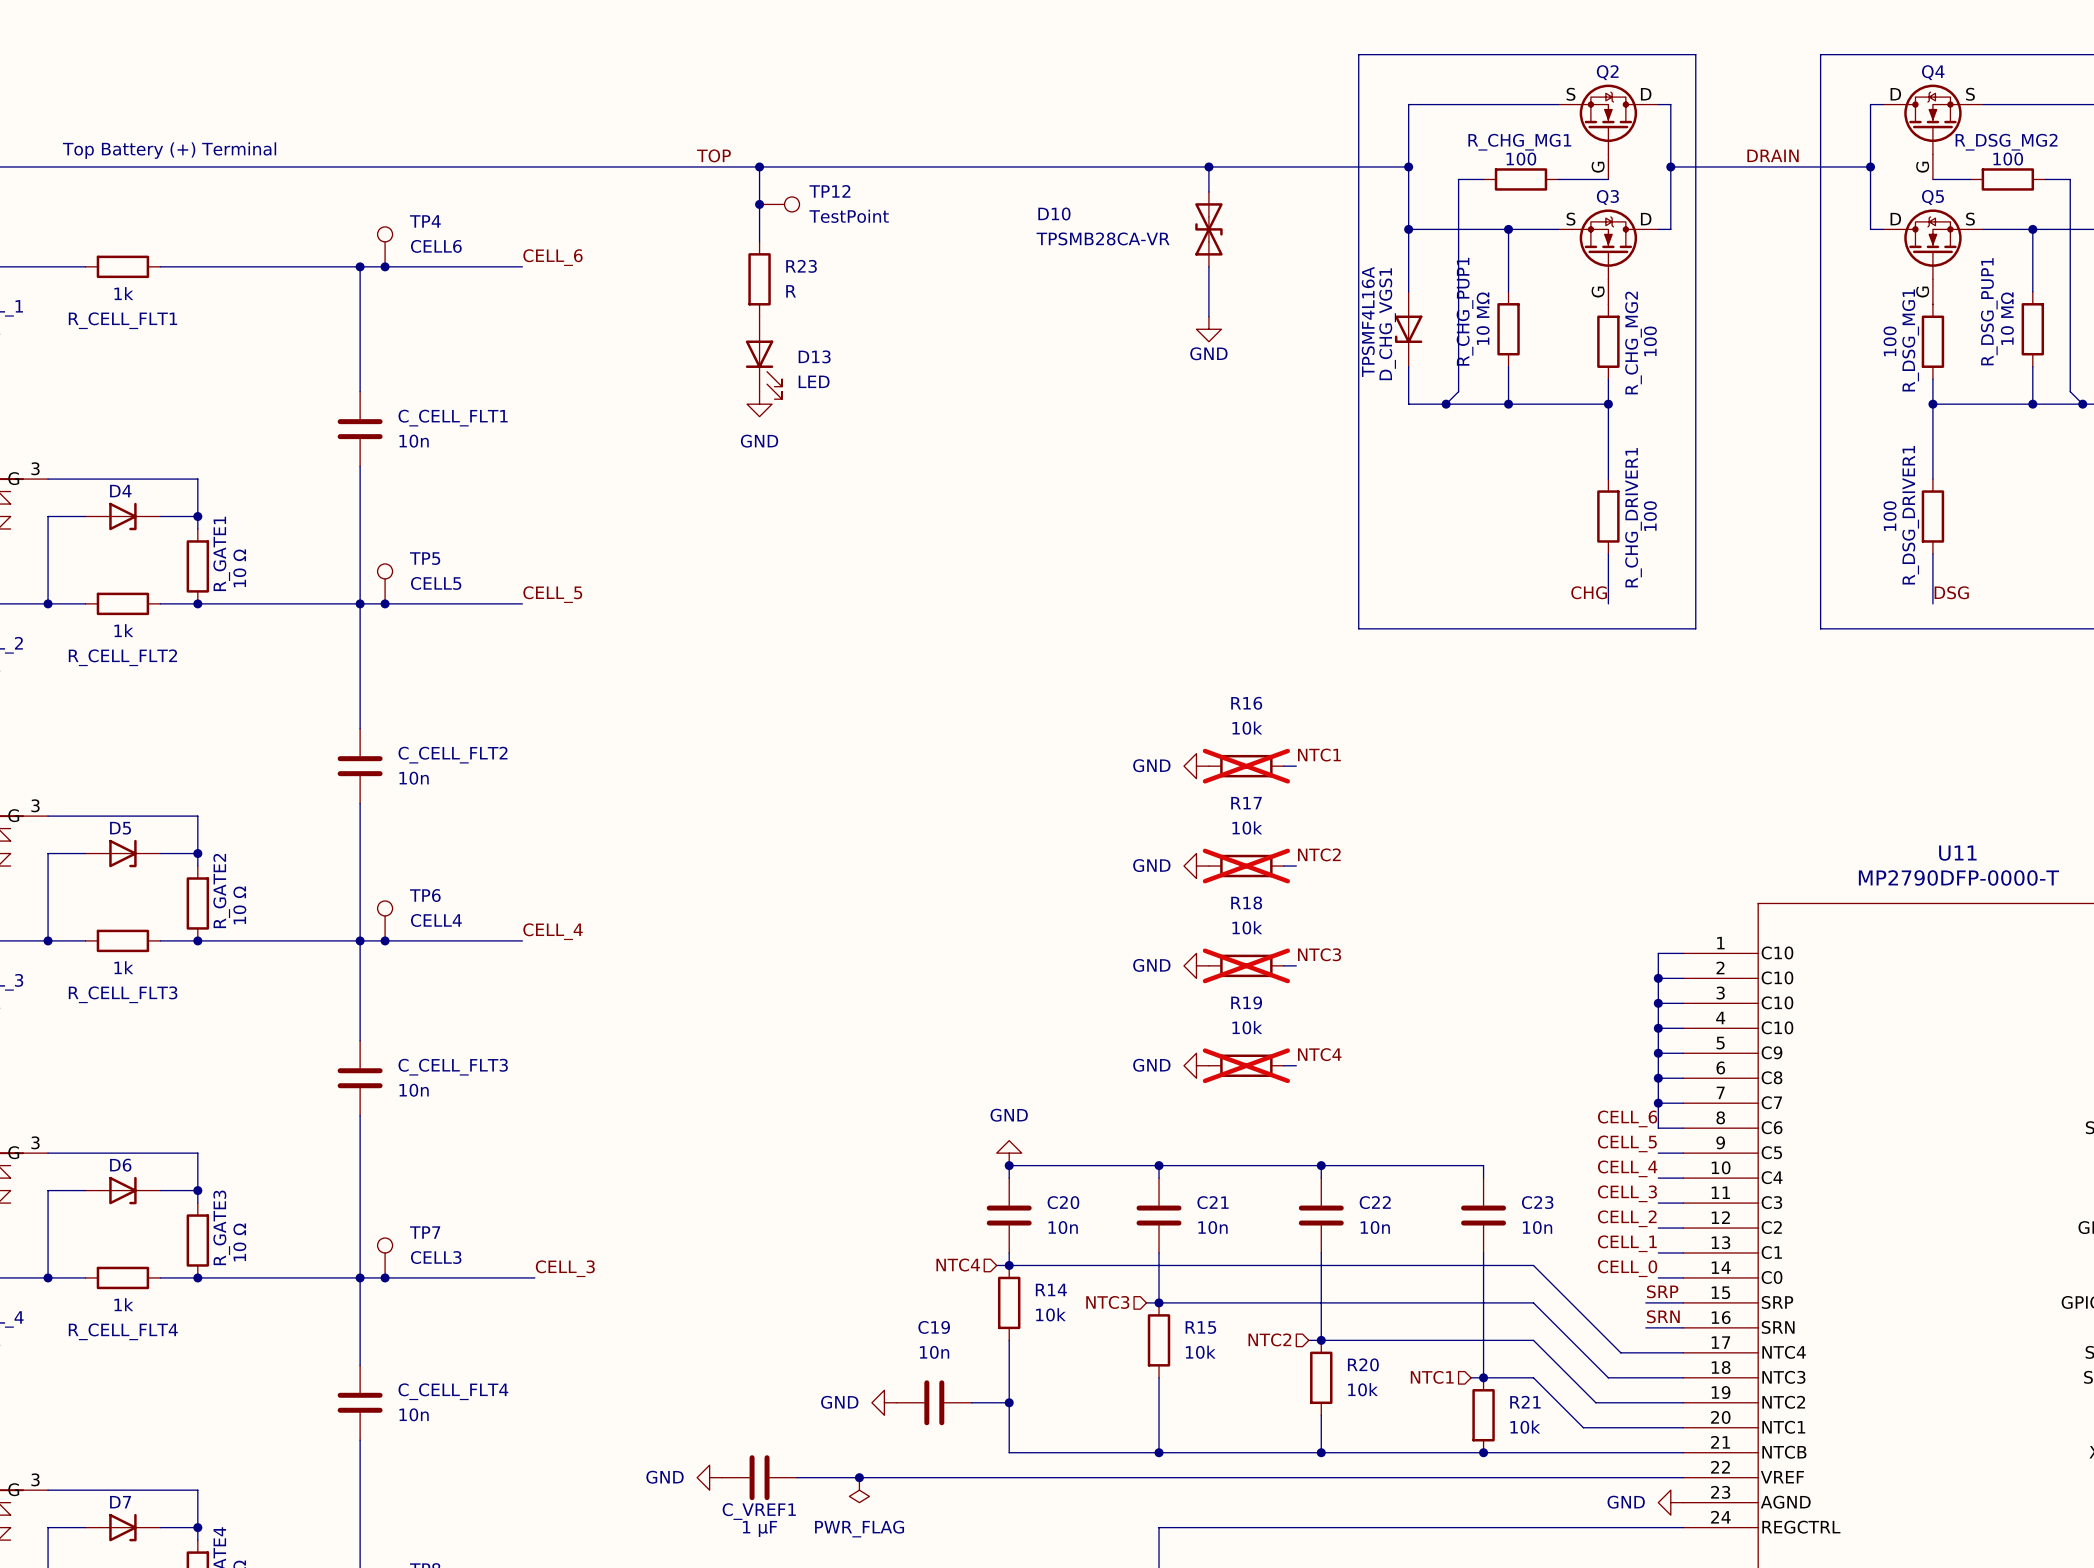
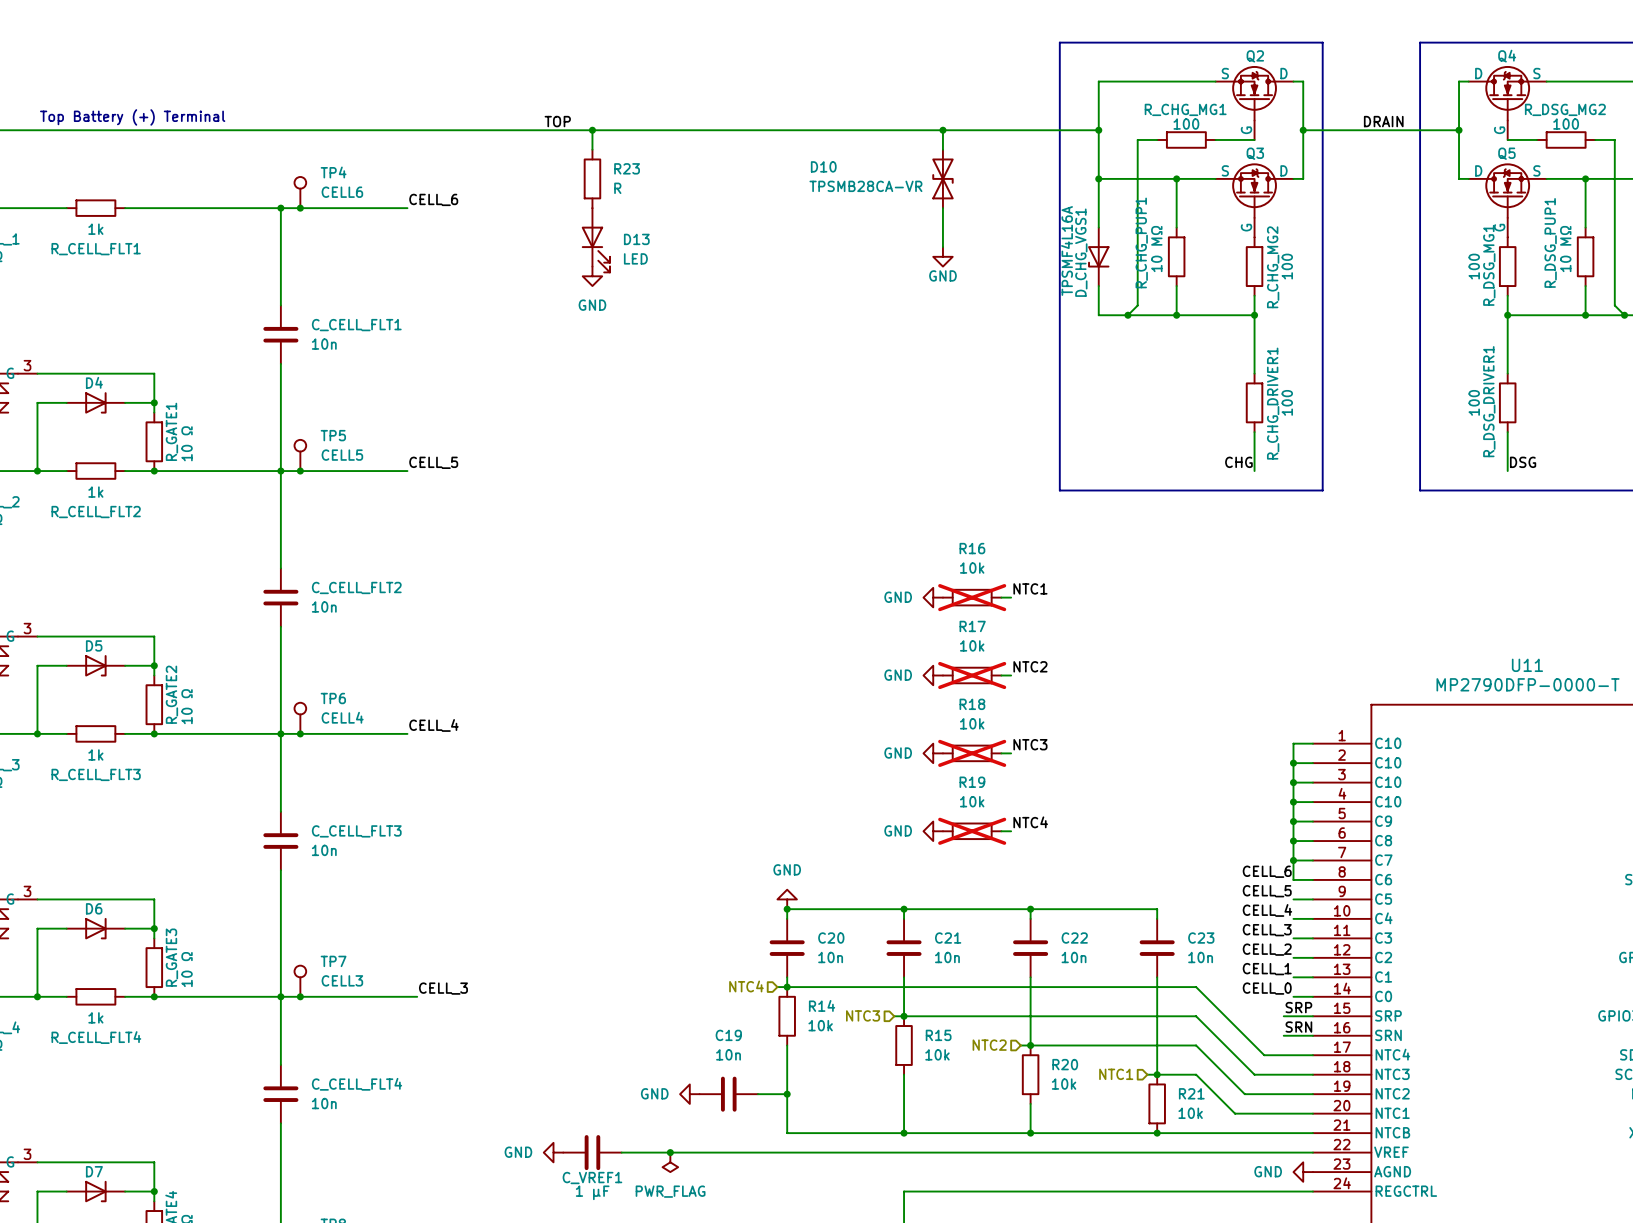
wire: (759, 191) (759, 241) -> none
junction: (759, 204) -> none
TP12: TestPoint (779, 204) -> none
R23 position: (759, 279) -> (592, 178)
D13 position: (763, 357) -> (595, 240)
power symbol position: GND (759, 404) -> GND (592, 276)

